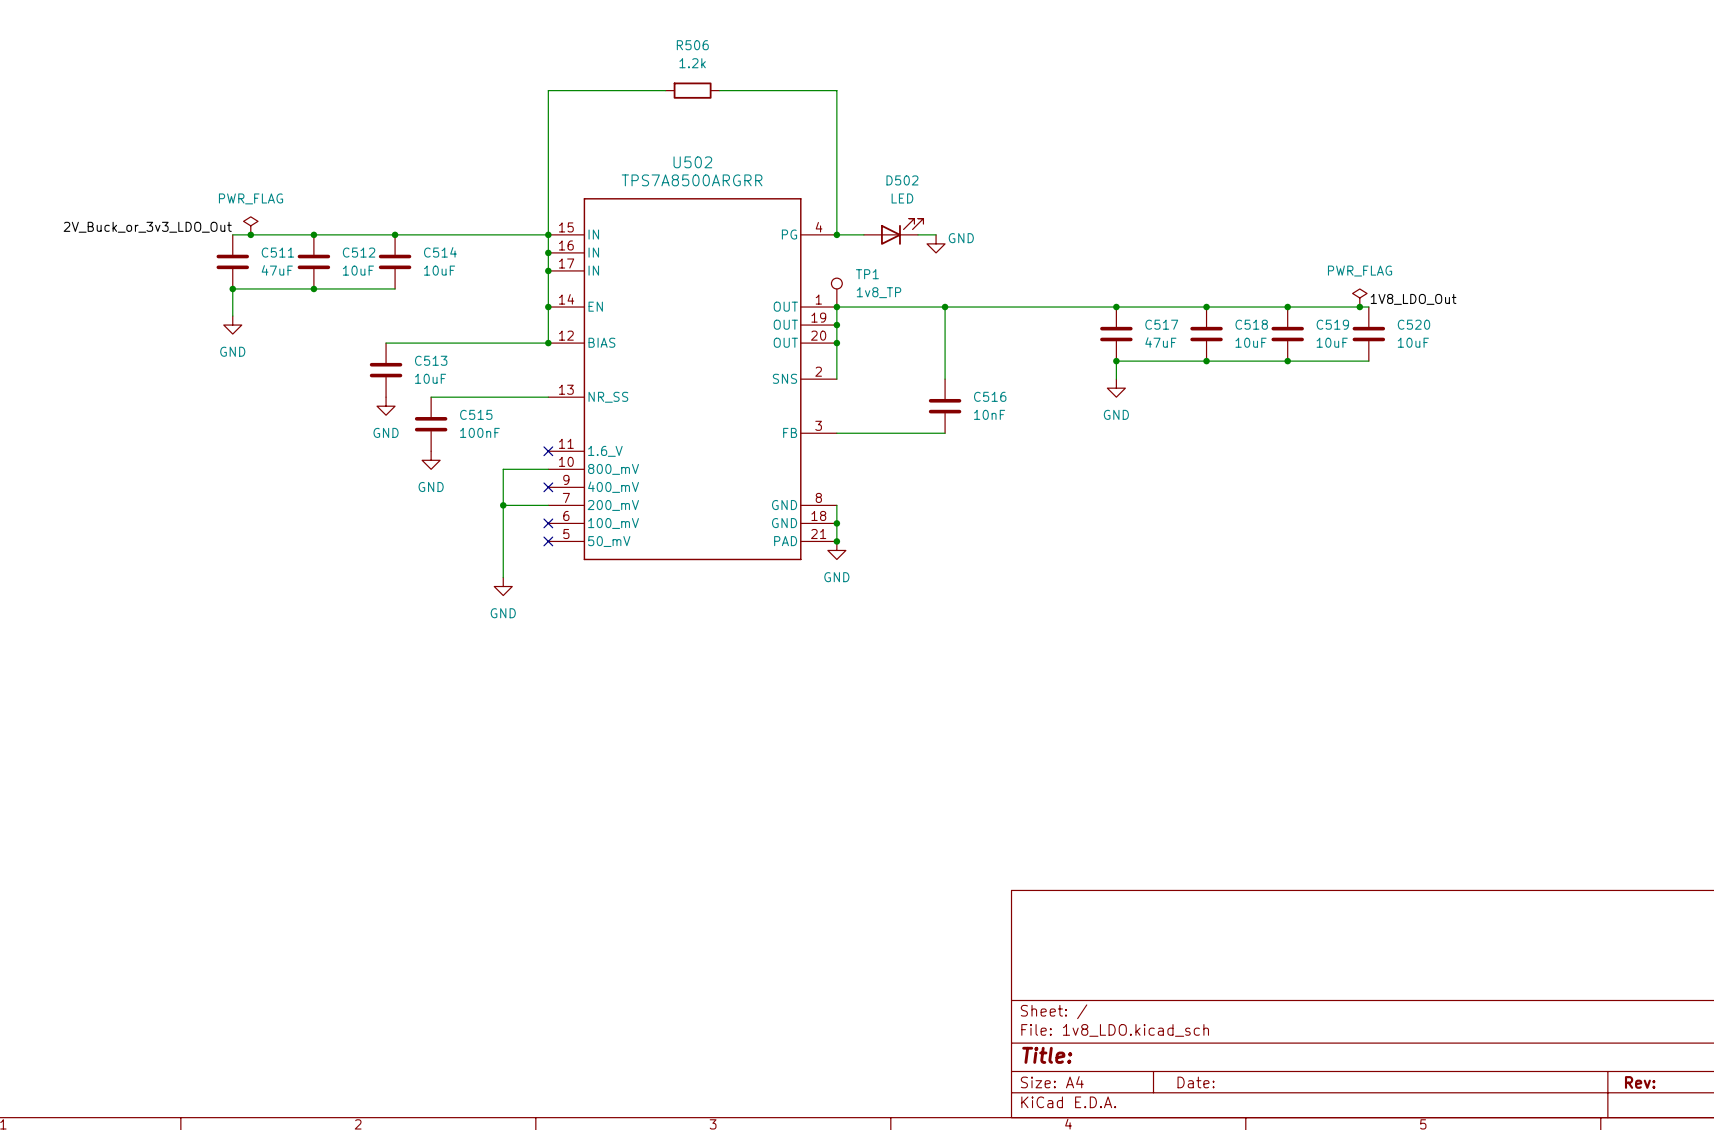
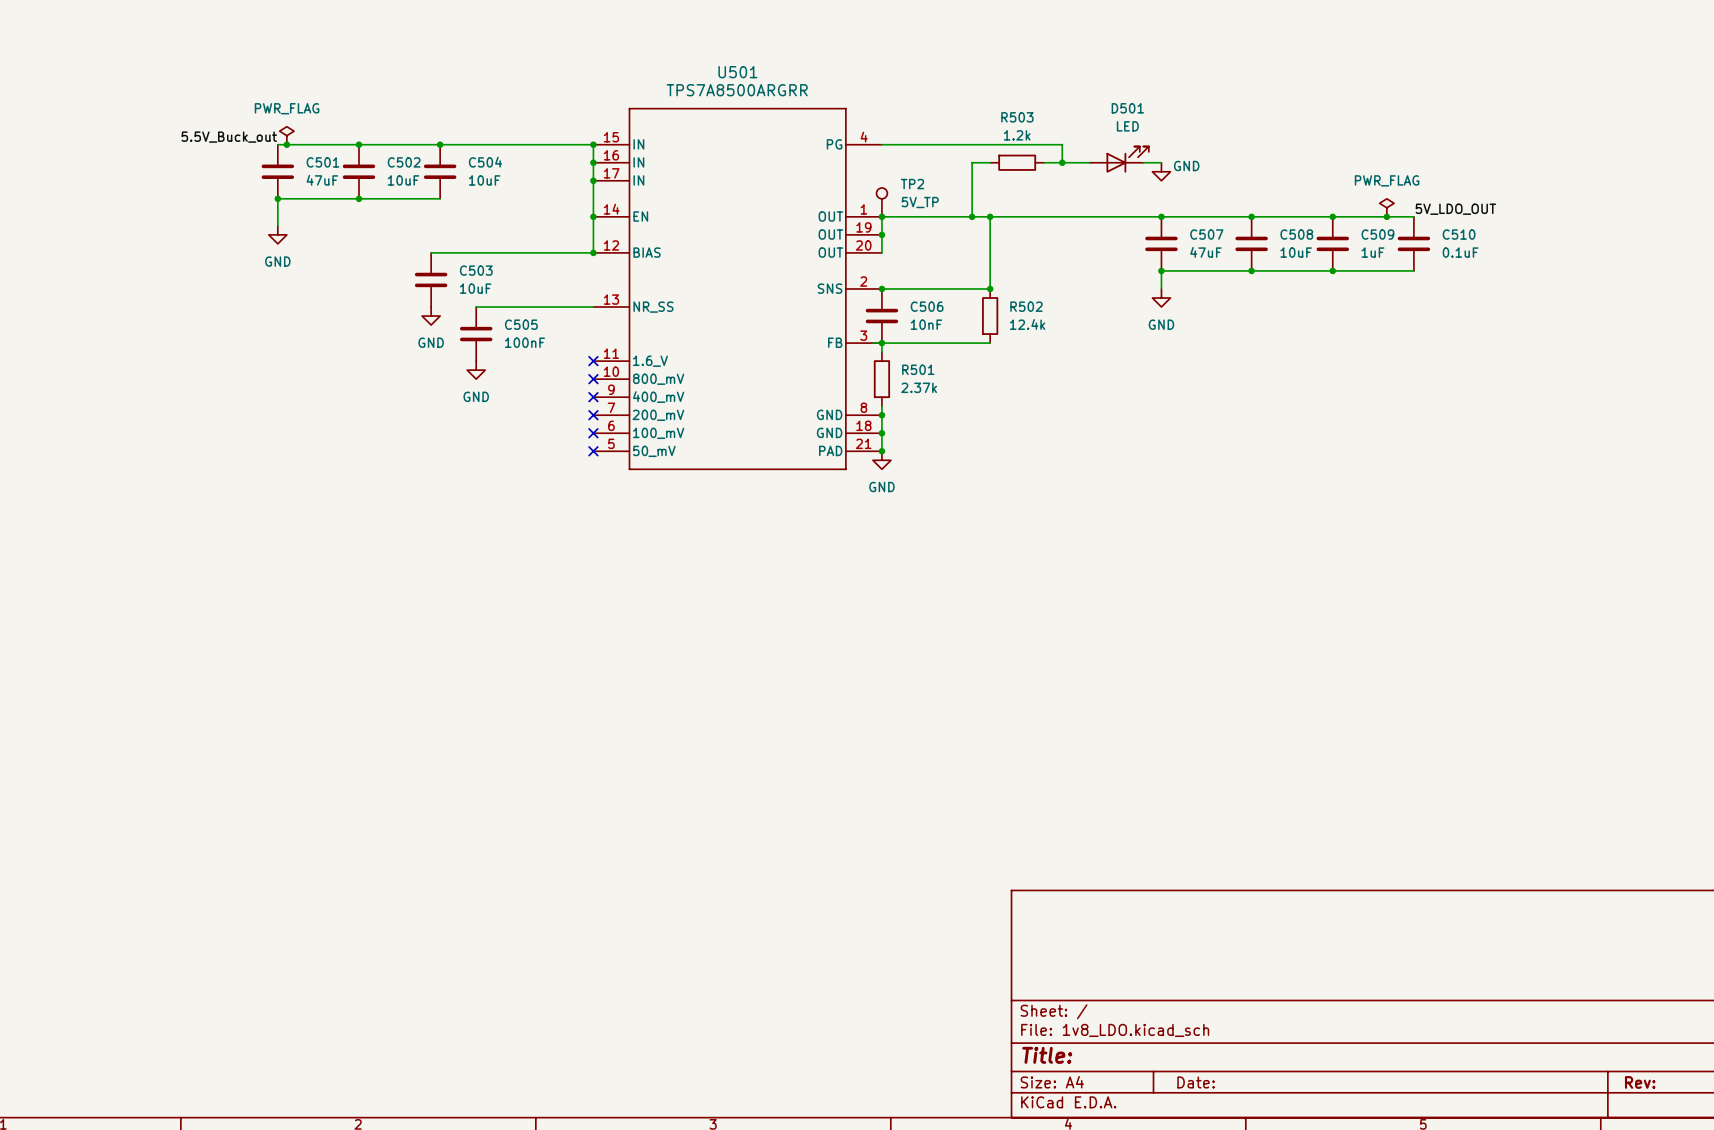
wire: (665, 90) (548, 90) (548, 343) (386, 343) -> none
R506: 1.2k (692, 90) -> none
wire: (719, 90) (836, 90) (836, 234) (863, 234) -> none
label: none -> 5.5V_Buck_out (229, 137)
wire: none -> (277, 144) (593, 144) (593, 252) (431, 252)
junction: none -> (286, 144)
junction: none -> (358, 144)
junction: none -> (440, 144)
junction: none -> (593, 144)
wire: none -> (881, 144) (1062, 144) (1062, 162)
D501: none -> LED (1119, 159)
junction: none -> (593, 162)
wire: none -> (990, 162) (972, 162) (972, 216)
R503: none -> 1.2k (1017, 162)
wire: none -> (1044, 162) (1089, 162)
junction: none -> (1062, 162)
wire: none -> (1143, 162) (1161, 162)
C501: none -> 47uF (277, 171)
C502: none -> 10uF (358, 171)
C504: none -> 10uF (440, 171)
power symbol: none -> GND (1161, 171)
junction: none -> (593, 180)
junction: none -> (277, 198)
junction: none -> (358, 198)
TP2: none -> 5V_TP (881, 202)
label: none -> 5V_LDO_OUT (1455, 209)
junction: none -> (593, 216)
junction: none -> (881, 216)
junction: none -> (972, 216)
wire: none -> (990, 216) (990, 288) (881, 288)
junction: none -> (990, 216)
junction: none -> (1161, 216)
junction: none -> (1251, 216)
junction: none -> (1332, 216)
junction: none -> (1386, 216)
wire: none -> (1413, 216) (881, 216) (881, 252)
power symbol position: PWR_FLAG (250, 225) -> PWR_FLAG (286, 135)
label: 2V_Buck_or_3v3_LDO_Out (147, 227) -> none
D502: LED (893, 231) -> none
wire: (232, 234) (548, 234) -> none
junction: (250, 234) -> none
power symbol: none -> GND (277, 234)
junction: (313, 234) -> none
junction: (395, 234) -> none
junction: (548, 234) -> none
junction: (836, 234) -> none
junction: none -> (881, 234)
wire: (918, 234) (936, 234) -> none
power symbol: GND (936, 243) -> none
C507: none -> 47uF (1161, 243)
C508: none -> 10uF (1251, 243)
C509: none -> 1uF (1332, 243)
C510: none -> 0.1uF (1413, 243)
junction: (548, 252) -> none
junction: none -> (593, 252)
C511: 47uF (232, 261) -> none
C512: 10uF (313, 261) -> none
C514: 10uF (395, 261) -> none
junction: (548, 270) -> none
junction: none -> (1161, 270)
junction: none -> (1251, 270)
junction: none -> (1332, 270)
C503: none -> 10uF (431, 279)
junction: (232, 288) -> none
junction: (313, 288) -> none
wire: (395, 288) (232, 288) (232, 316) -> (440, 198) (277, 198) (277, 225)
U501: none -> TPS7A8500ARGRR (737, 288)
junction: none -> (881, 288)
junction: none -> (990, 288)
TP1: 1v8_TP (836, 292) -> none
power symbol position: PWR_FLAG (1359, 297) -> PWR_FLAG (1386, 207)
label: 1V8_LDO_Out (1413, 299) -> none
junction: (548, 307) -> none
junction: (836, 307) -> none
wire: (945, 307) (945, 379) -> none
junction: (945, 307) -> none
junction: (1116, 307) -> none
junction: (1206, 307) -> none
junction: (1287, 307) -> none
junction: (1359, 307) -> none
wire: (1368, 307) (836, 307) (836, 379) -> none
power symbol: none -> GND (431, 316)
C506: none -> 10nF (881, 316)
R502: none -> 12.4k (990, 316)
power symbol: GND (232, 325) -> none
junction: (836, 325) -> none
C505: none -> 100nF (476, 334)
C517: 47uF (1116, 334) -> none
C518: 10uF (1206, 334) -> none
C519: 10uF (1287, 334) -> none
C520: 10uF (1368, 334) -> none
junction: (548, 343) -> none
junction: (836, 343) -> none
wire: none -> (872, 343) (990, 343)
wire: none -> (881, 343) (881, 352)
junction: none -> (881, 343)
no-connect mark: none -> (593, 361)
junction: (1116, 361) -> none
junction: (1206, 361) -> none
junction: (1287, 361) -> none
wire: (1368, 361) (1116, 361) (1116, 379) -> (1413, 270) (1161, 270) (1161, 288)
C513: 10uF (386, 370) -> none
power symbol: none -> GND (476, 370)
no-connect mark: none -> (593, 379)
U502: TPS7A8500ARGRR (692, 379) -> none
R501: none -> 2.37k (881, 379)
power symbol position: GND (1116, 388) -> GND (1161, 297)
wire: (431, 397) (548, 397) -> (476, 307) (593, 307)
no-connect mark: none -> (593, 397)
power symbol: GND (386, 406) -> none
wire: none -> (881, 406) (881, 451)
C516: 10nF (945, 406) -> none
no-connect mark: none -> (593, 415)
junction: none -> (881, 415)
C515: 100nF (431, 424) -> none
no-connect mark: none -> (593, 433)
wire: (836, 433) (945, 433) -> none
junction: none -> (881, 433)
no-connect mark: (548, 451) -> none
no-connect mark: none -> (593, 451)
junction: none -> (881, 451)
power symbol: GND (431, 460) -> none
wire: (548, 469) (503, 469) (503, 577) -> none
no-connect mark: (548, 487) -> none
wire: (503, 505) (548, 505) -> none
junction: (503, 505) -> none
wire: (836, 505) (836, 541) -> none
no-connect mark: (548, 523) -> none
junction: (836, 523) -> none
no-connect mark: (548, 541) -> none
junction: (836, 541) -> none
power symbol position: GND (836, 550) -> GND (881, 460)
power symbol: GND (503, 586) -> none

